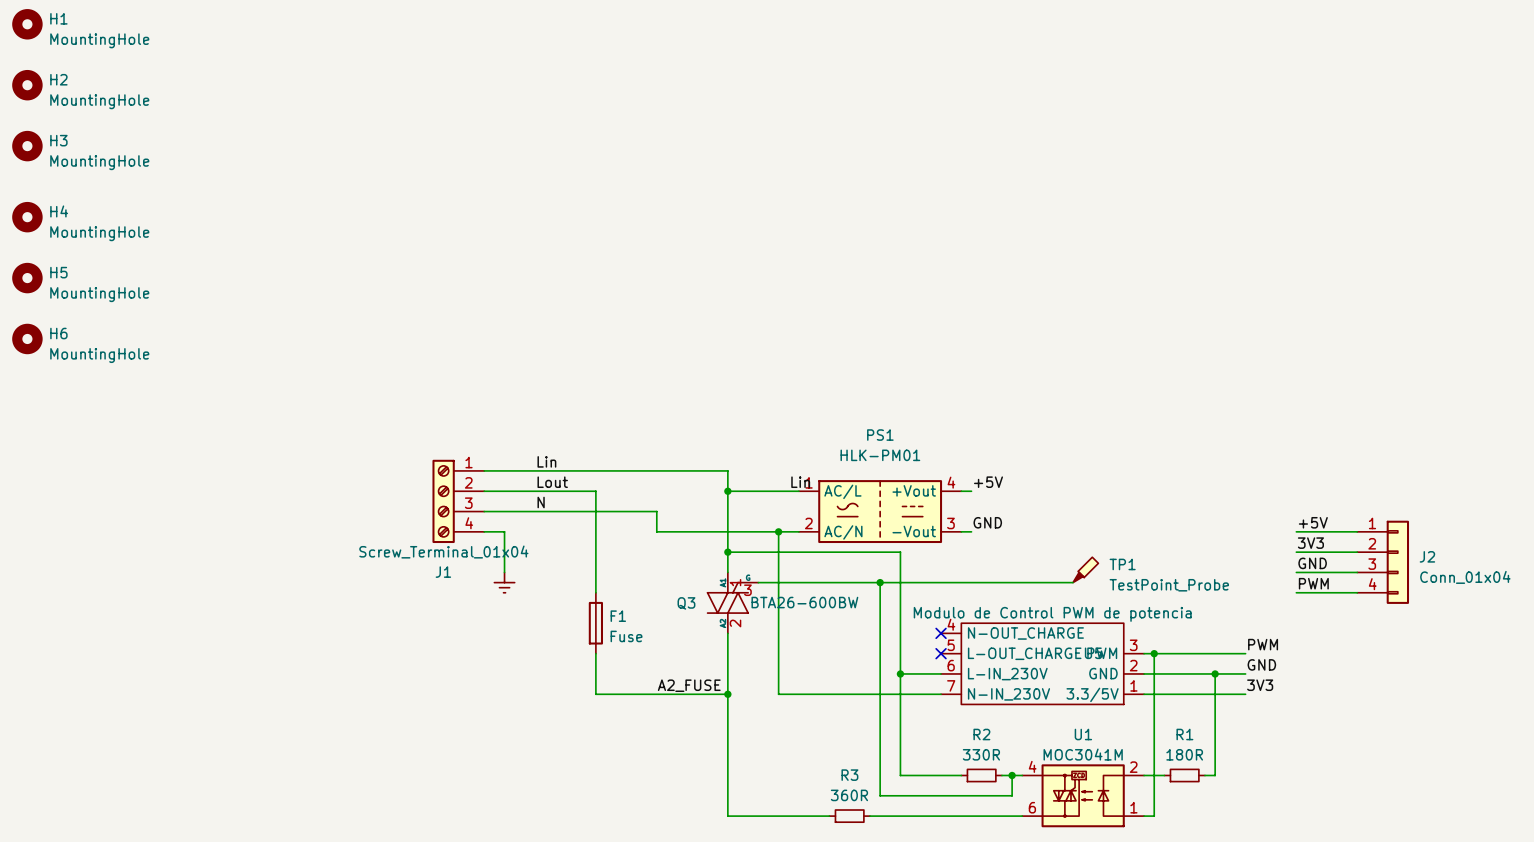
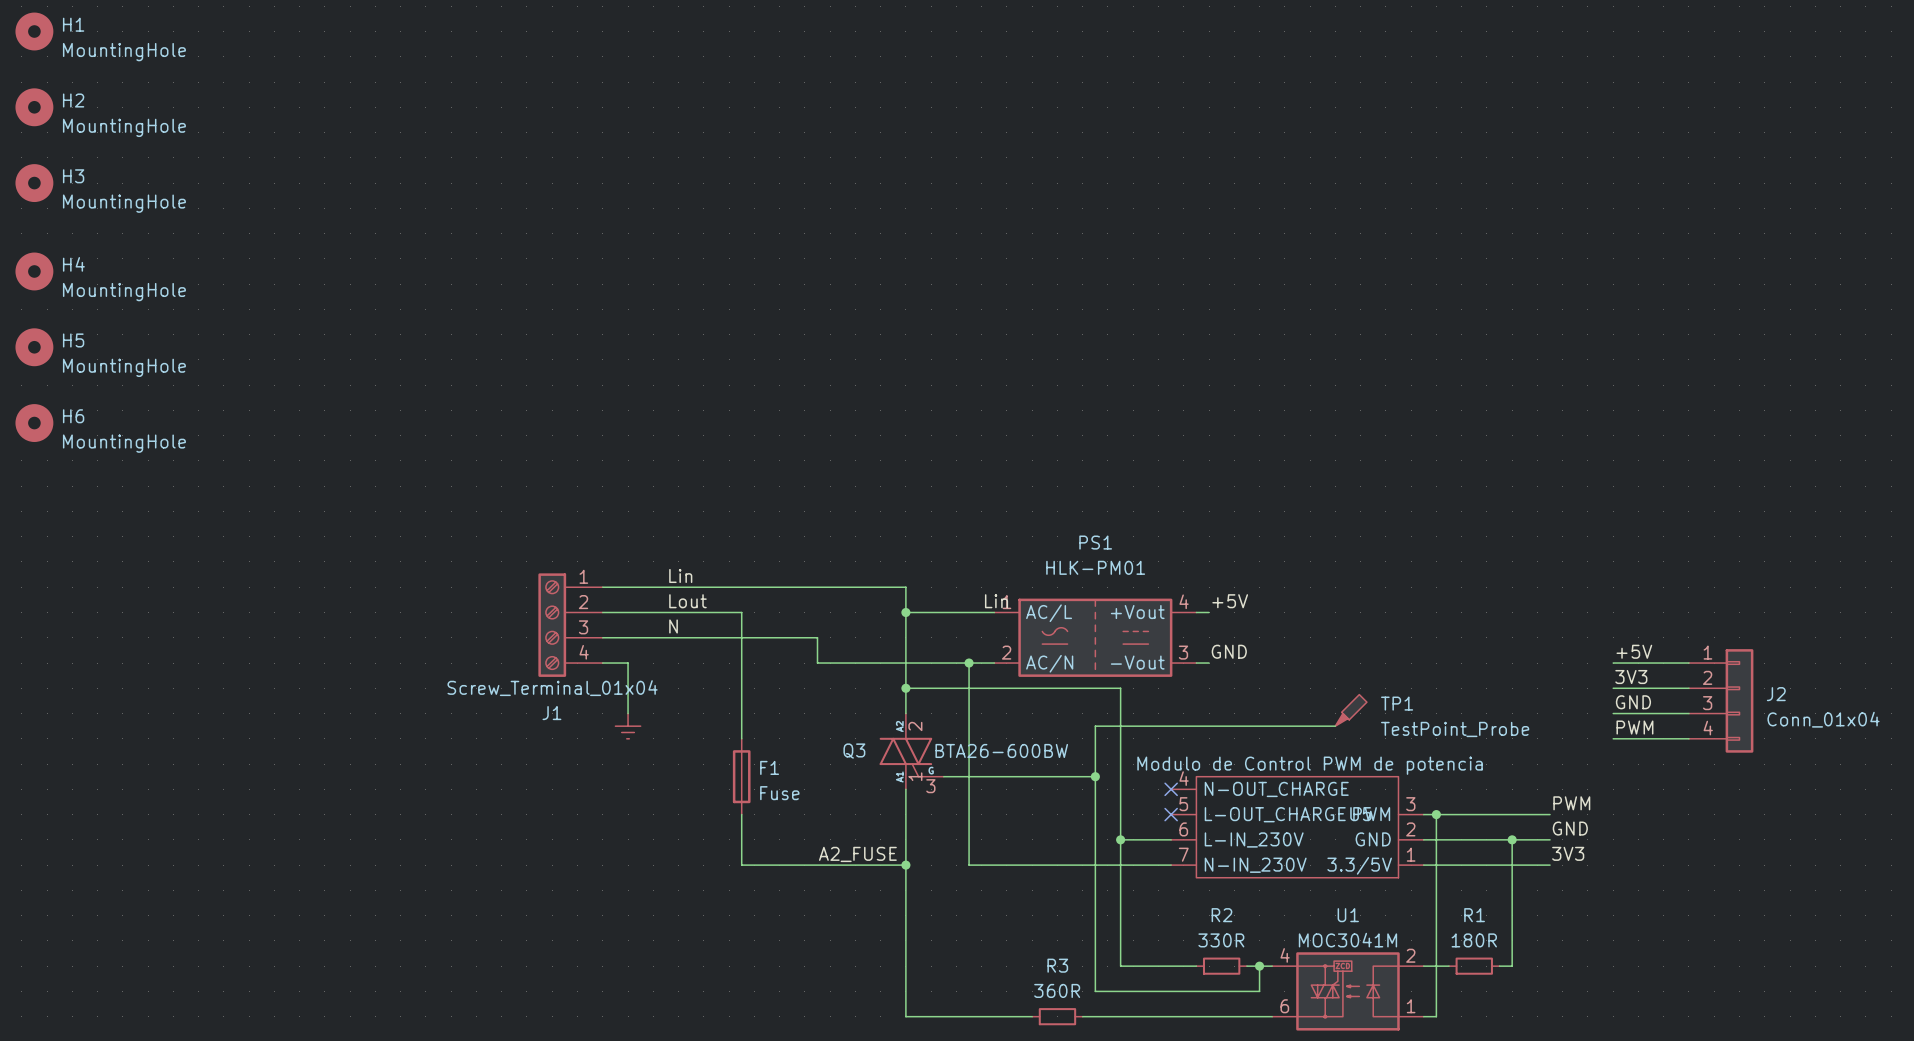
wire: (758, 582) (880, 582) -> (943, 776) (1095, 776)
junction position: (880, 582) -> (1095, 776)
Q3 flip: as is (727, 598) -> up-down (905, 757)

